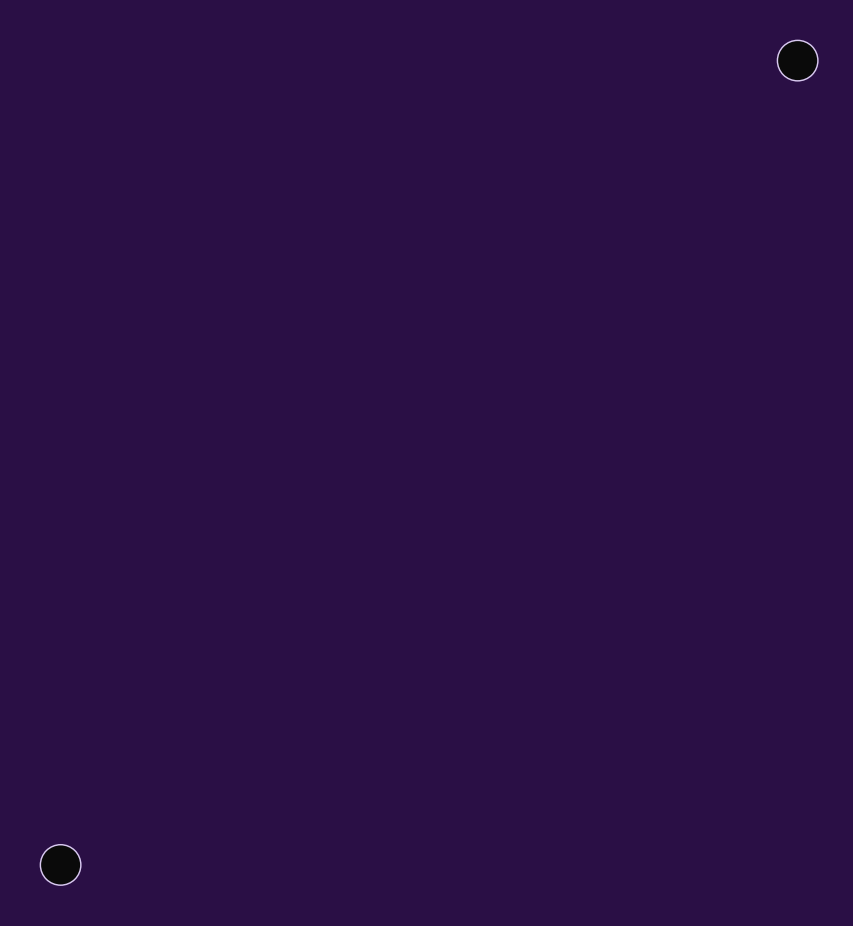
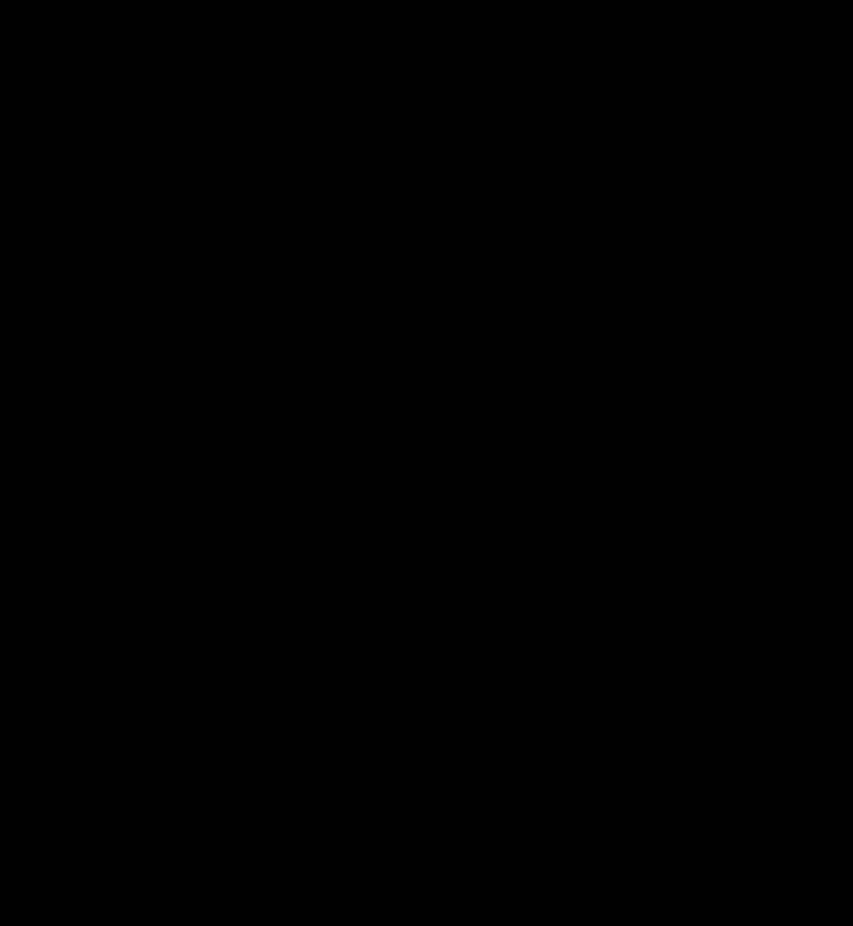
part: (797, 60) -> none
part: (60, 864) -> none

